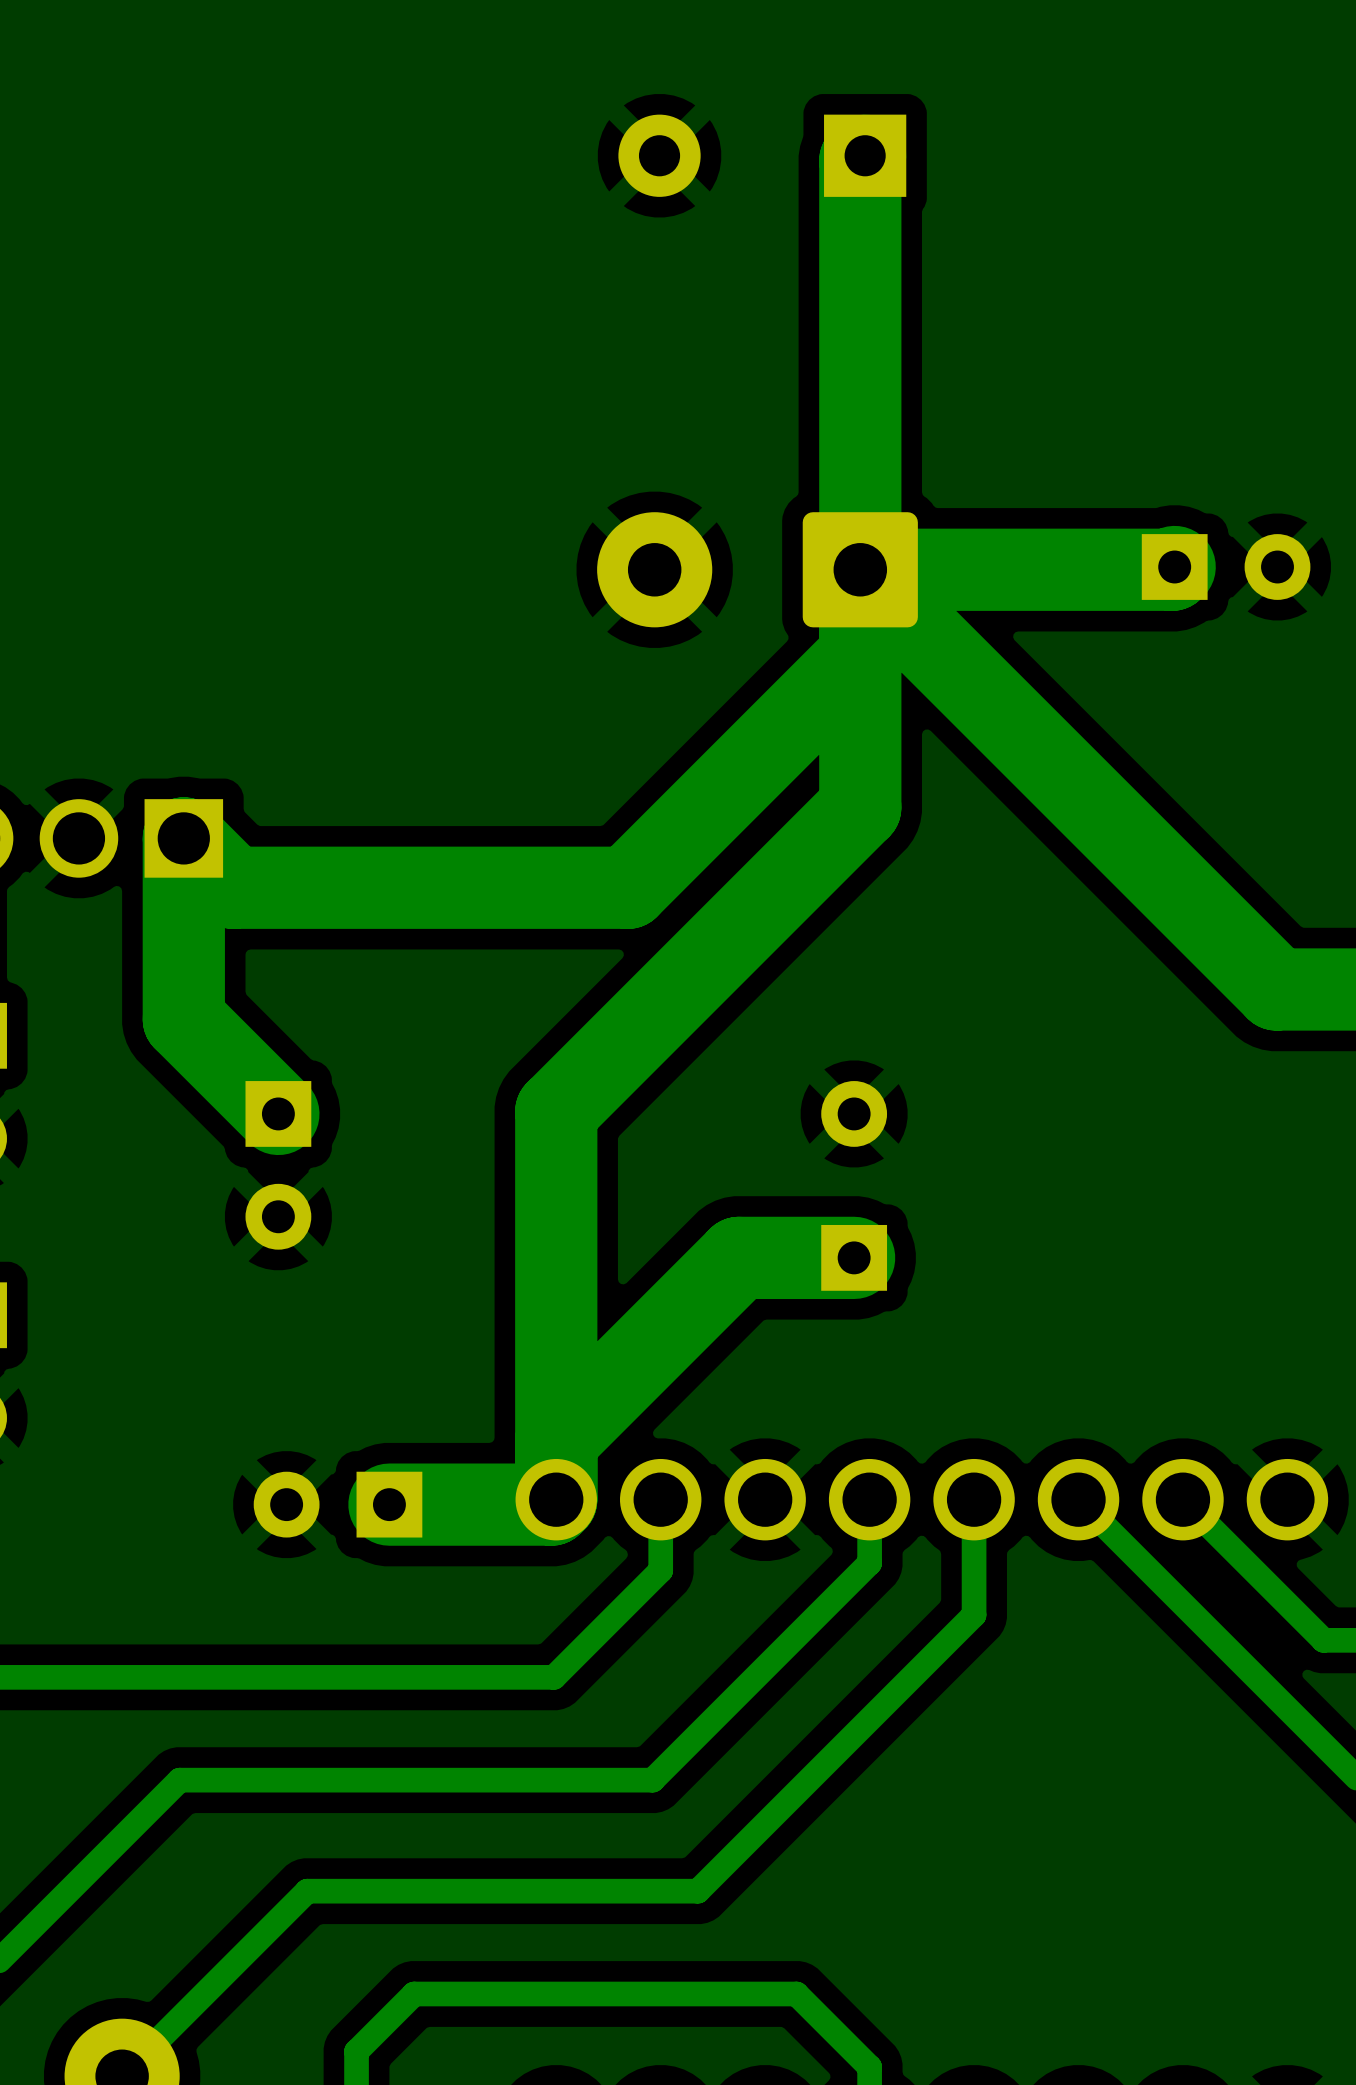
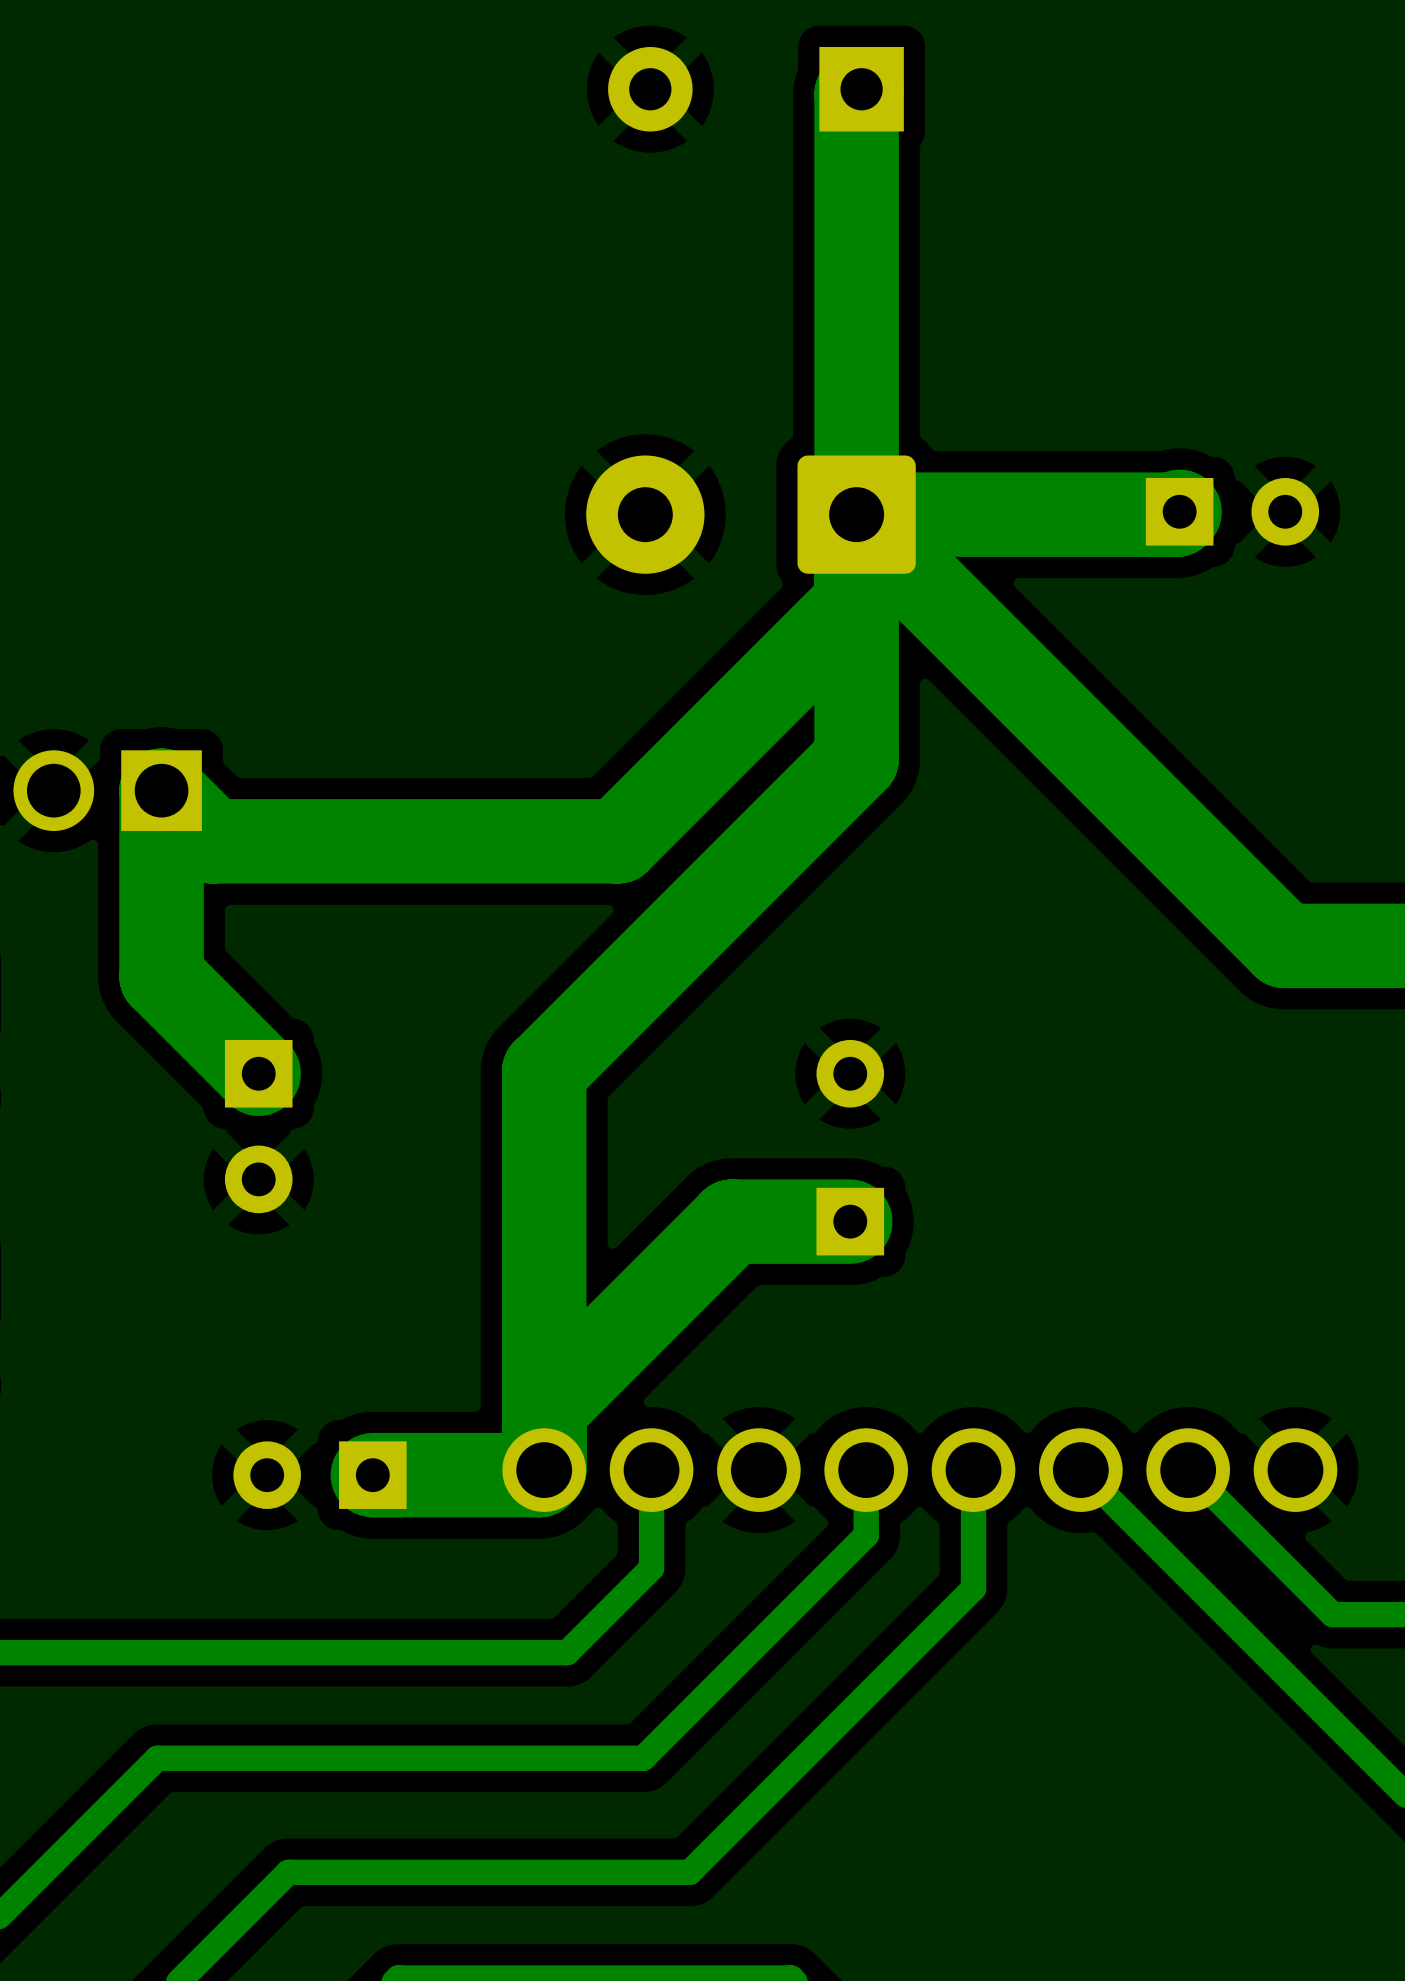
track: (660, 1570) (553, 1677) -> (651, 1542) (651, 1568) (567, 1652) (541, 1652)

